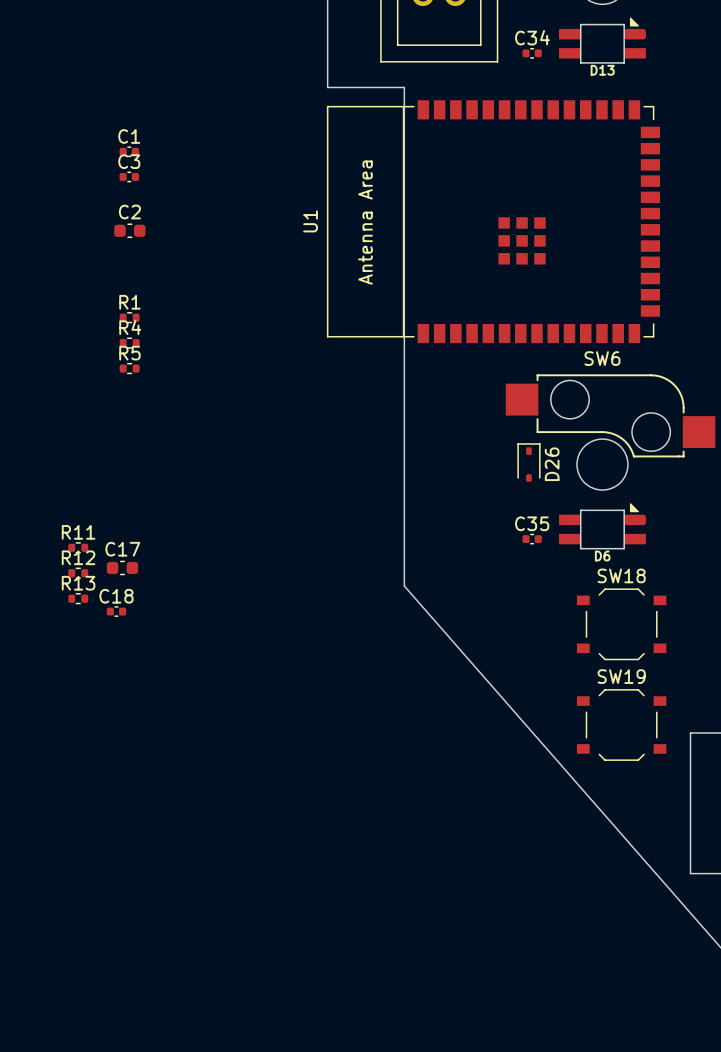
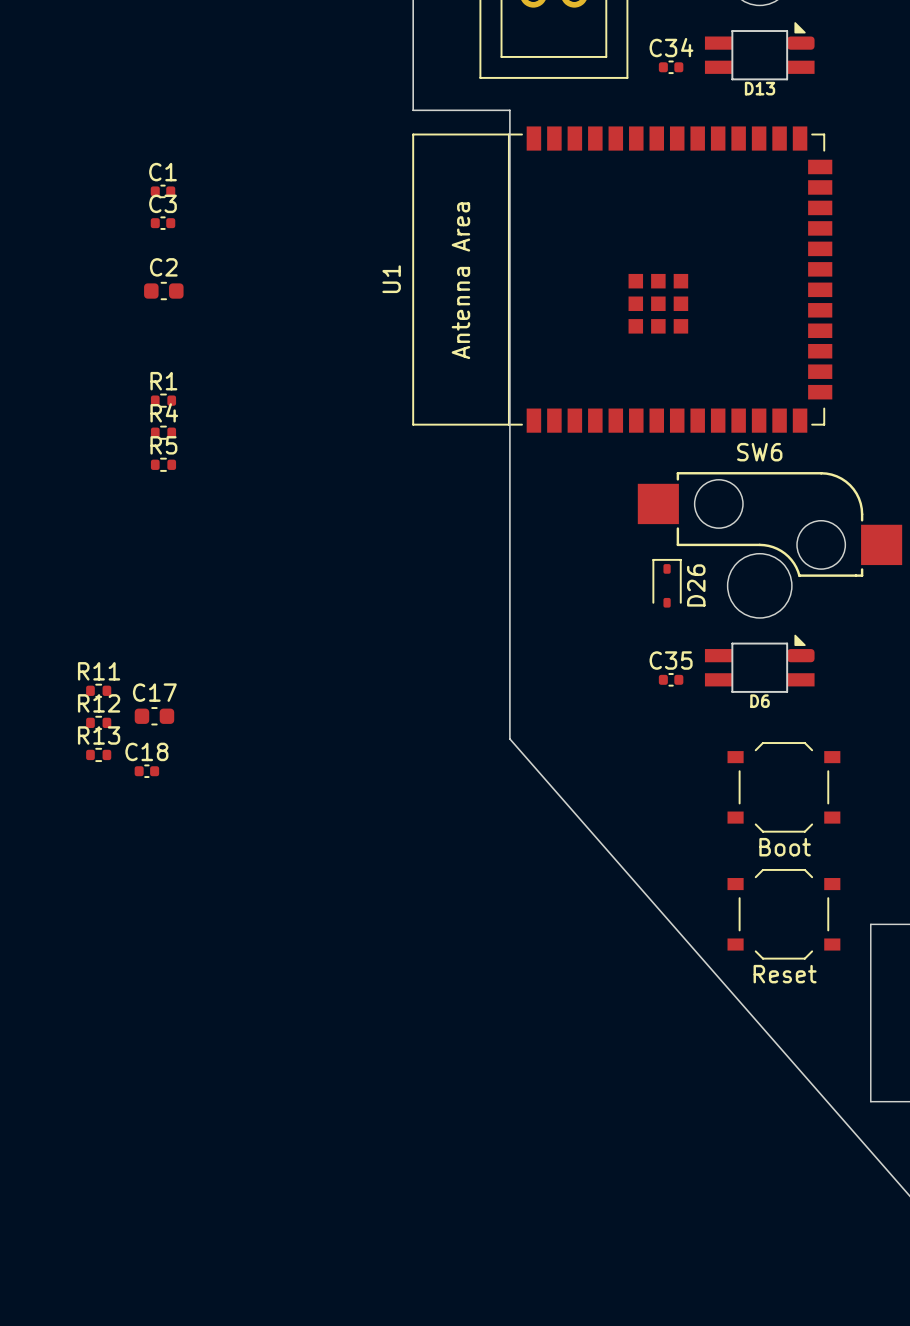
SW18 name: SW18 (621, 575) -> none
SW18 value: none -> Boot (785, 847)
SW19 name: SW19 (621, 676) -> none
SW19 value: none -> Reset (785, 974)

